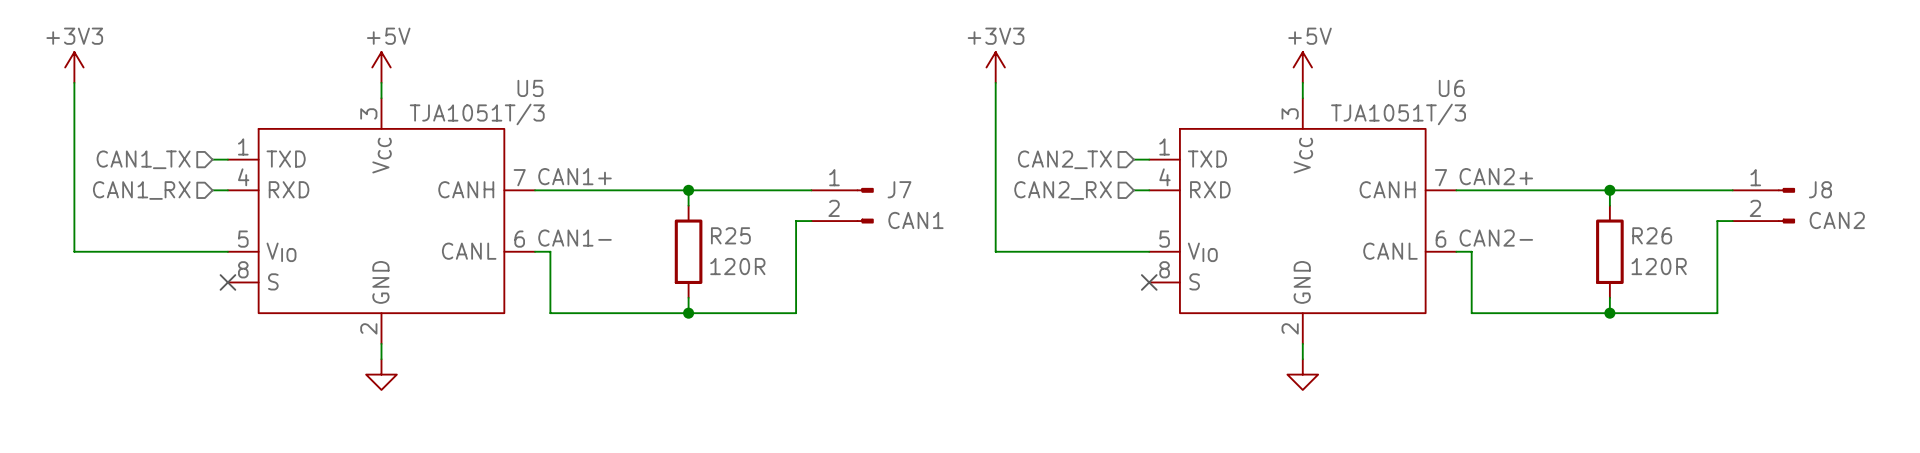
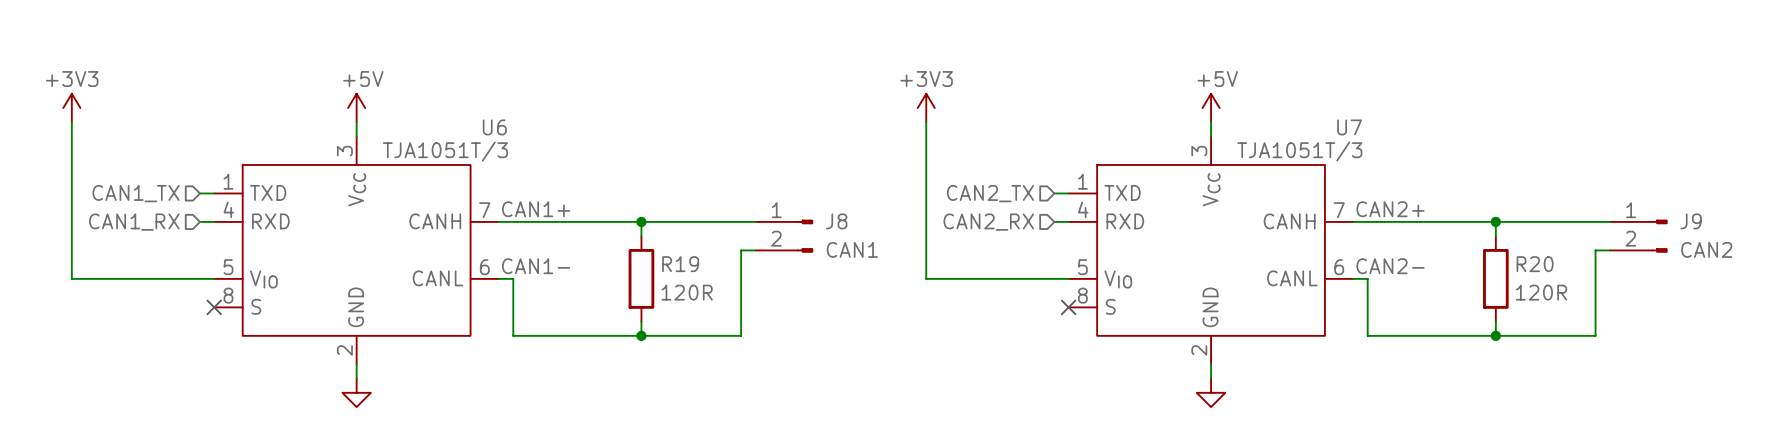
U5 name: U5 (530, 88) -> U6 (494, 127)
U6 name: U6 (1451, 88) -> U7 (1349, 127)
J7 name: J7 (899, 189) -> J8 (836, 221)
J8 name: J8 (1820, 189) -> J9 (1691, 221)
R25 name: R25 (730, 235) -> R19 (680, 264)
R26 name: R26 (1652, 235) -> R20 (1535, 264)

